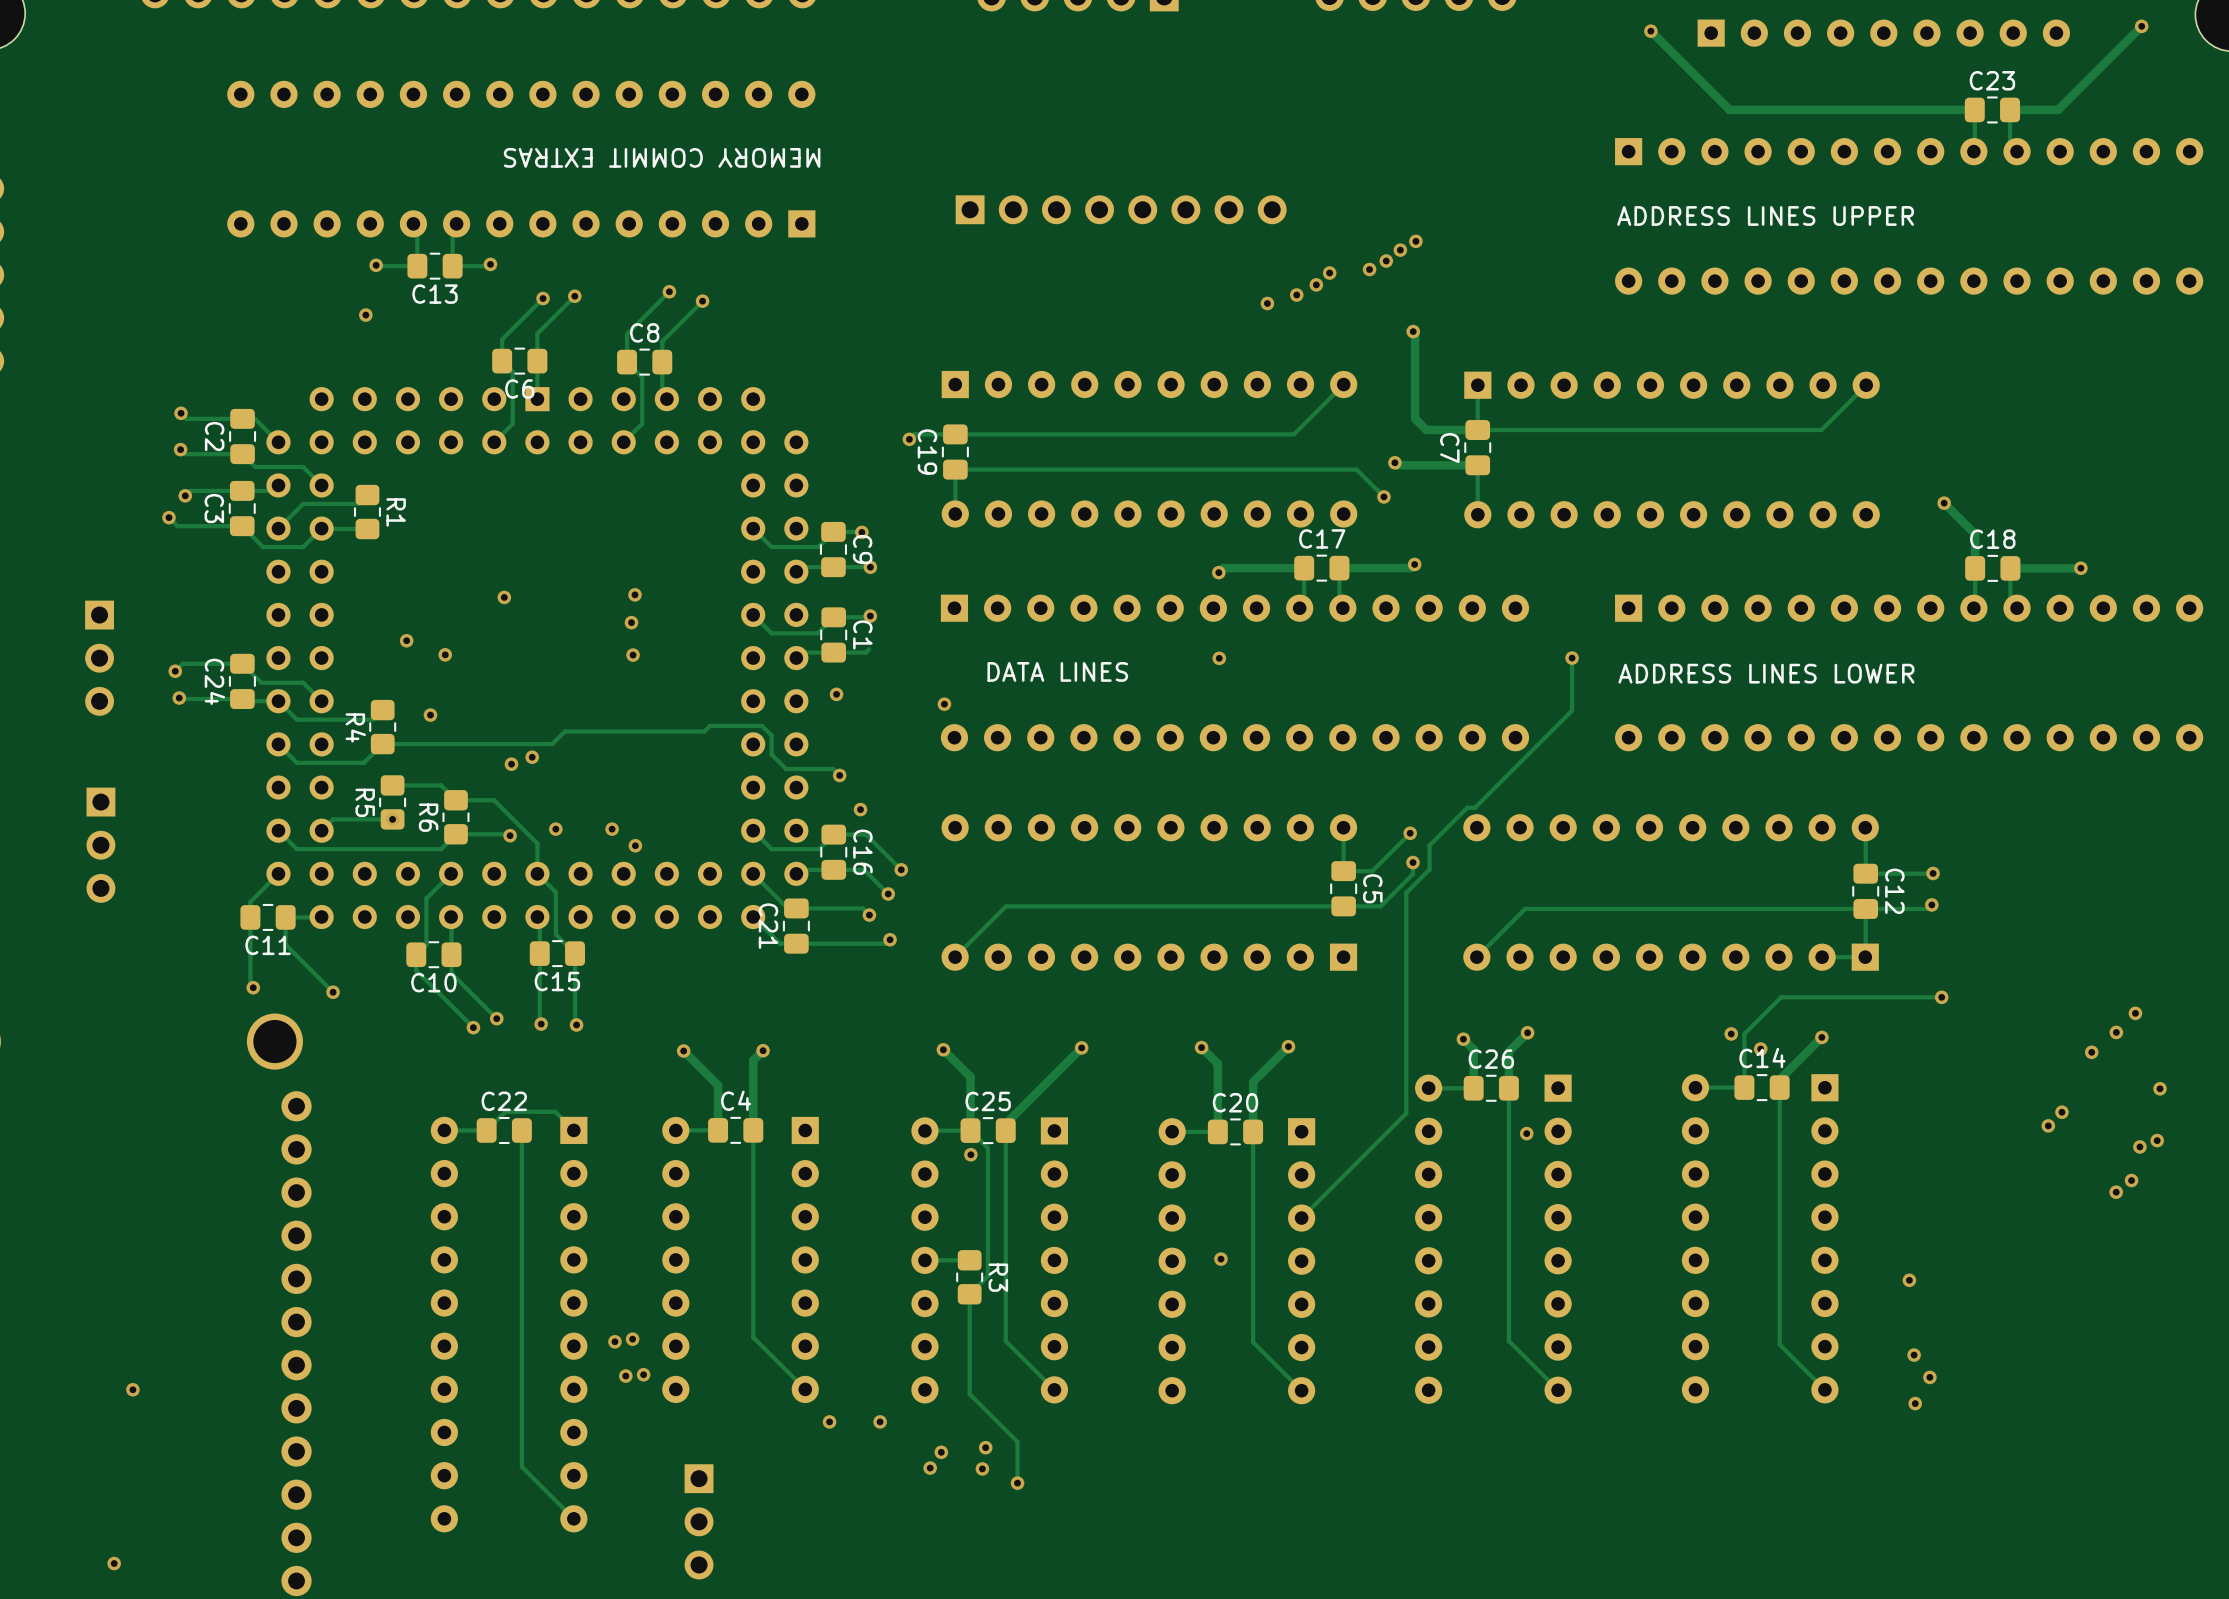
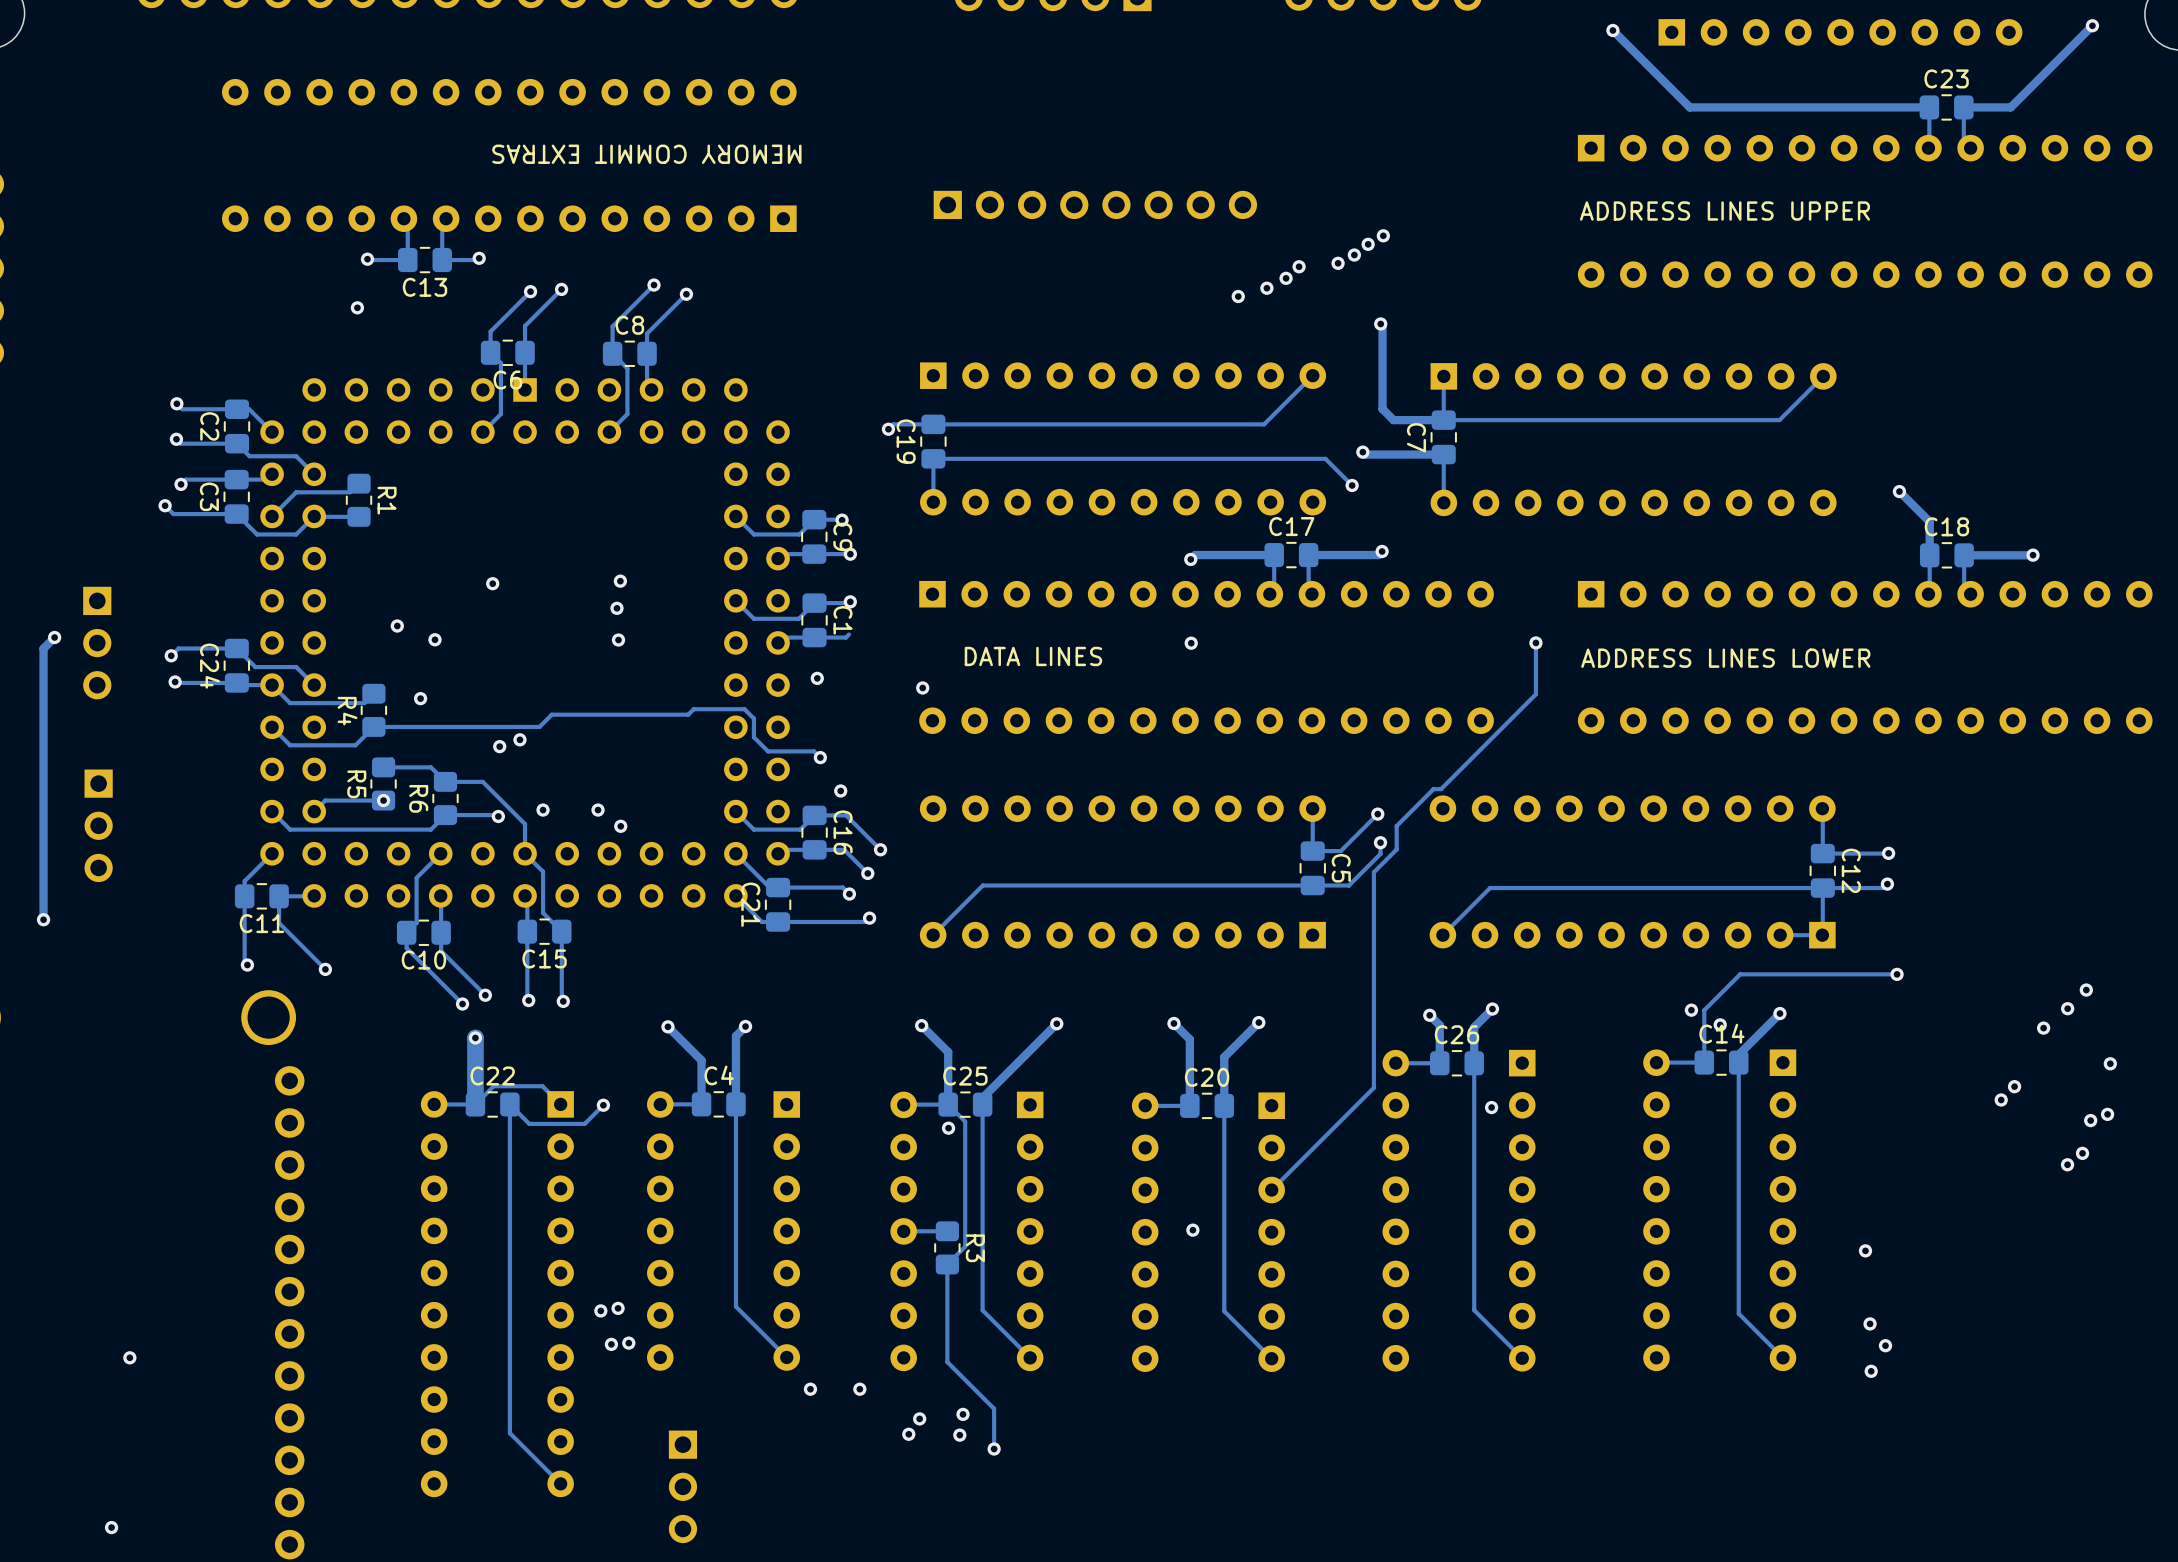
track: none -> (54, 637) (43, 648) (43, 919)
via: none -> (54, 637)
via: none -> (43, 919)
track: none -> (475, 1037) (475, 1104)
via: none -> (475, 1037)
track: none -> (509, 1104) (529, 1123) (584, 1123) (603, 1105)
via: none -> (603, 1105)

